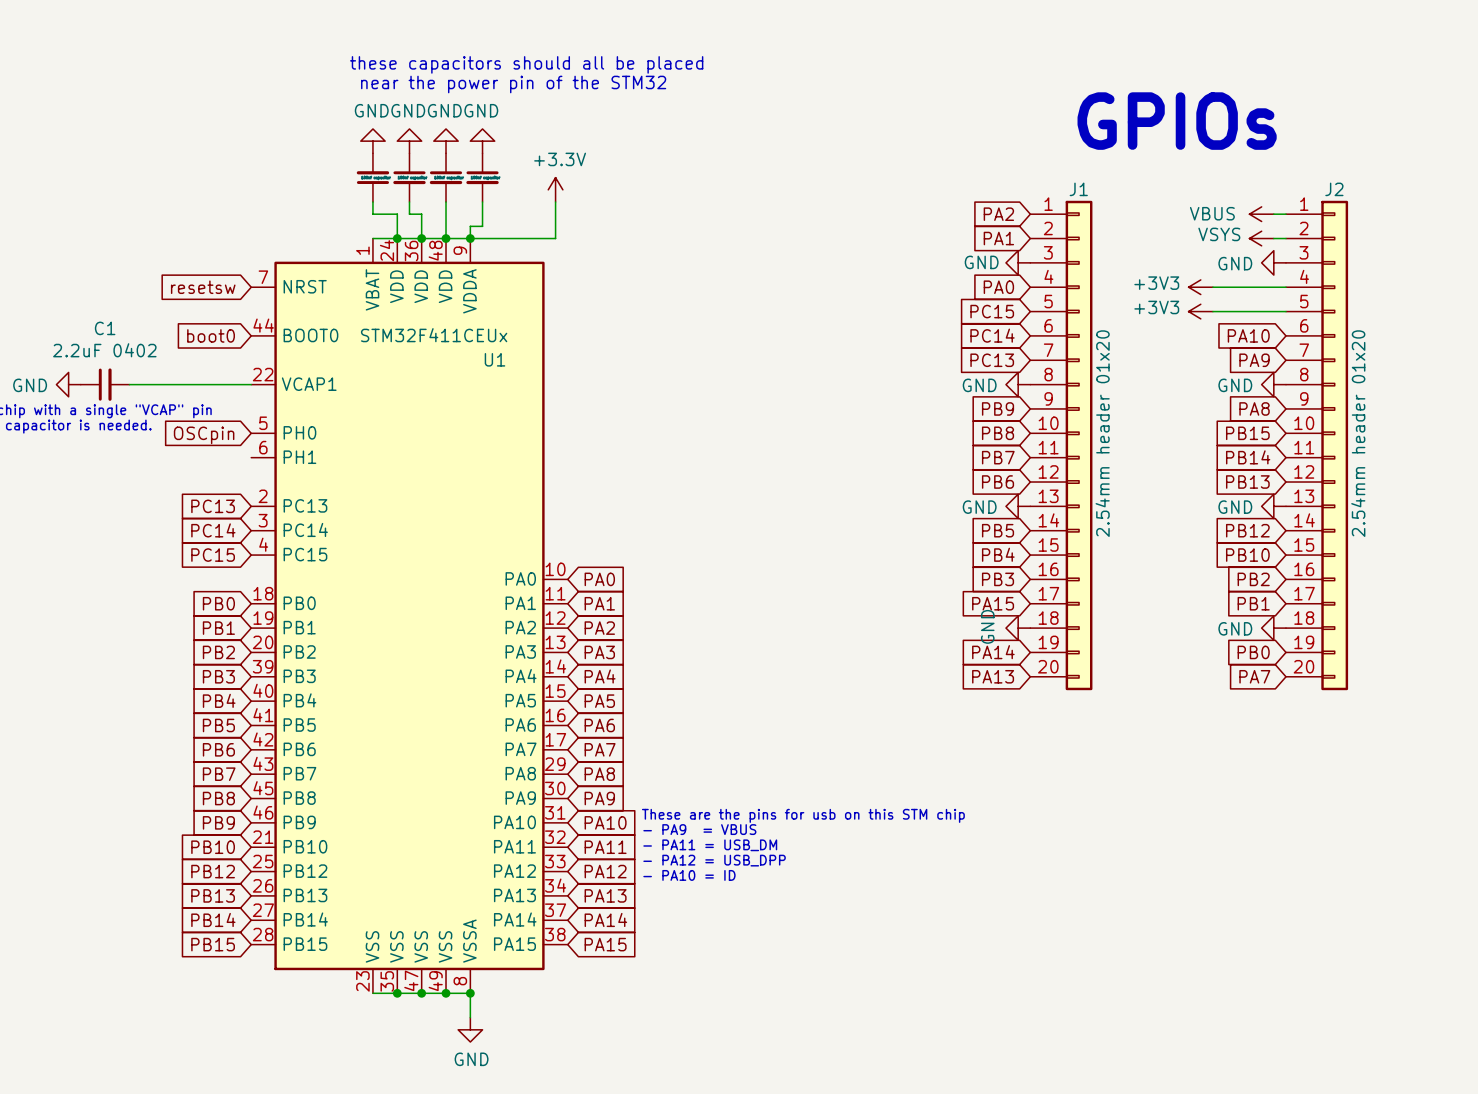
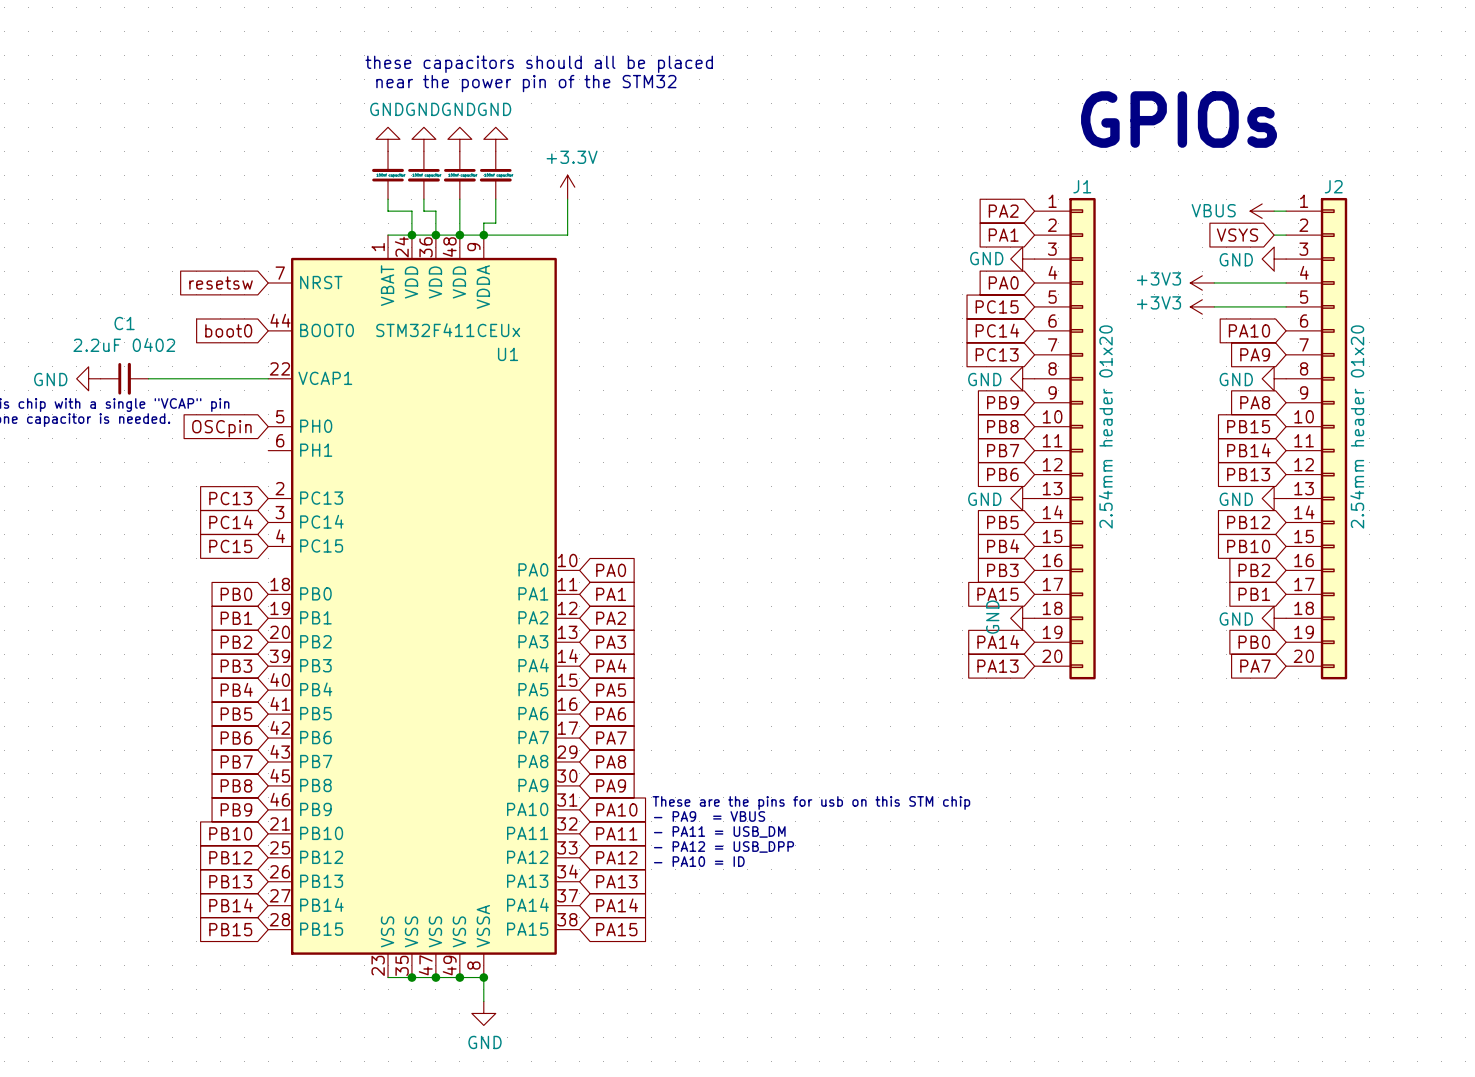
global label: none -> VSYS (1237, 235)
power symbol: VSYS (1261, 238) -> none

